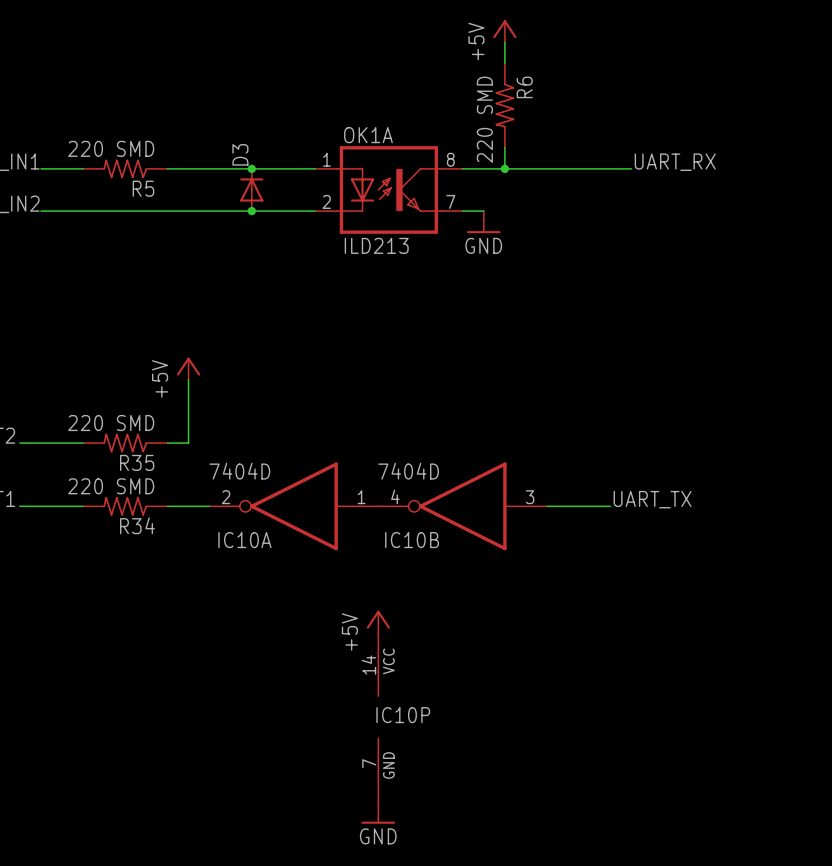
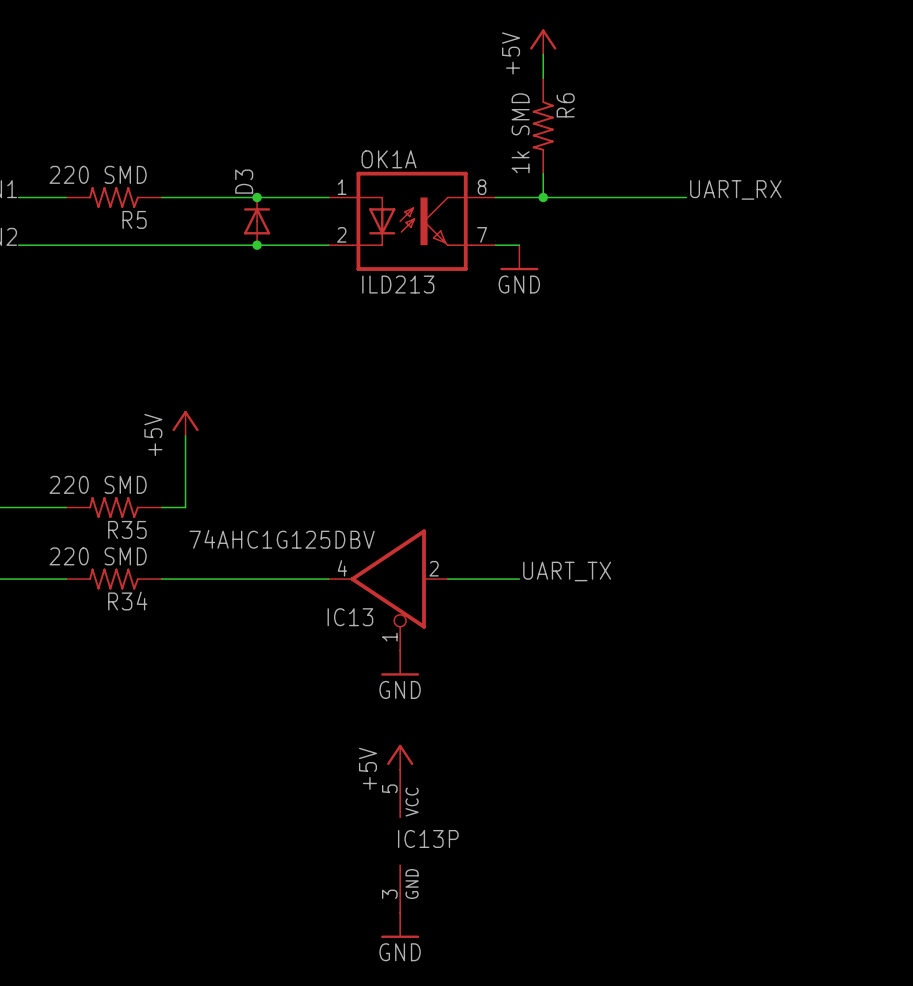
R6 value: 220 SMD (484, 119) -> 1k SMD (520, 133)
label position: UART_TX (652, 499) -> UART_TX (567, 571)
wire: none -> (209, 579) (328, 579)
IC10A: 7404D (293, 506) -> none
IC10B: 7404D (462, 506) -> none
wire: (547, 506) (610, 506) -> (447, 579) (519, 579)
IC13: none -> 74AHC1G125DBV (388, 590)
power symbol: none -> GND (400, 663)
power symbol position: +5V (378, 621) -> +5V (400, 757)
IC10P: (378, 717) -> none
IC13P: none -> (400, 841)

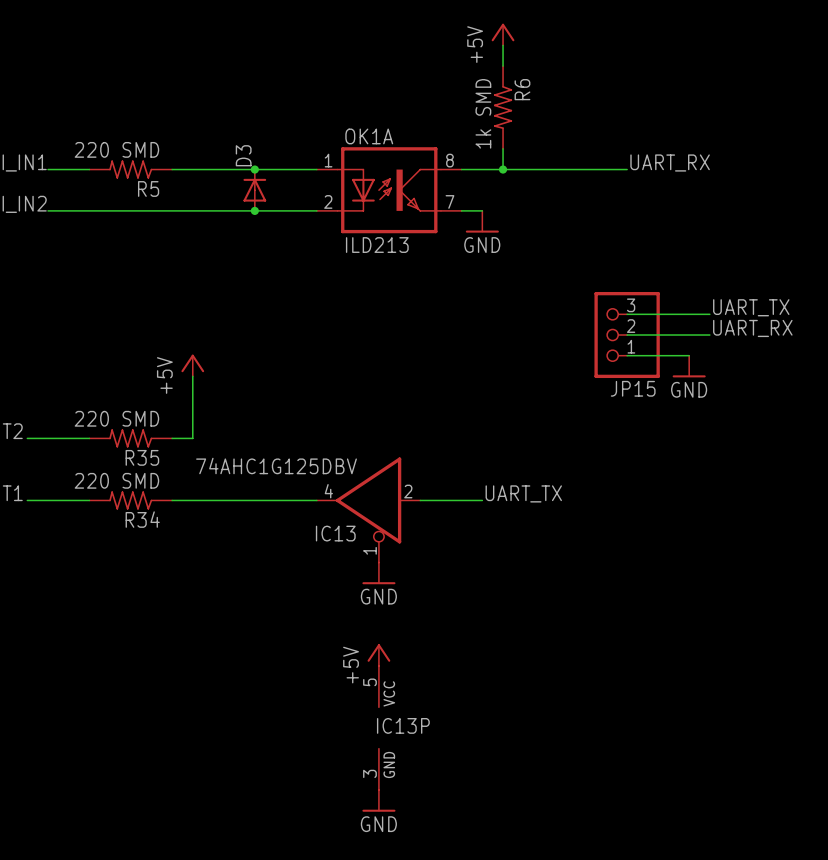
label: none -> UART_TX (751, 307)
wire: none -> (627, 314) (709, 314)
label: none -> UART_RX (752, 328)
wire: none -> (627, 335) (709, 335)
JP15: none -> (627, 335)
wire: none -> (627, 355) (689, 355)
power symbol: none -> GND (689, 366)

